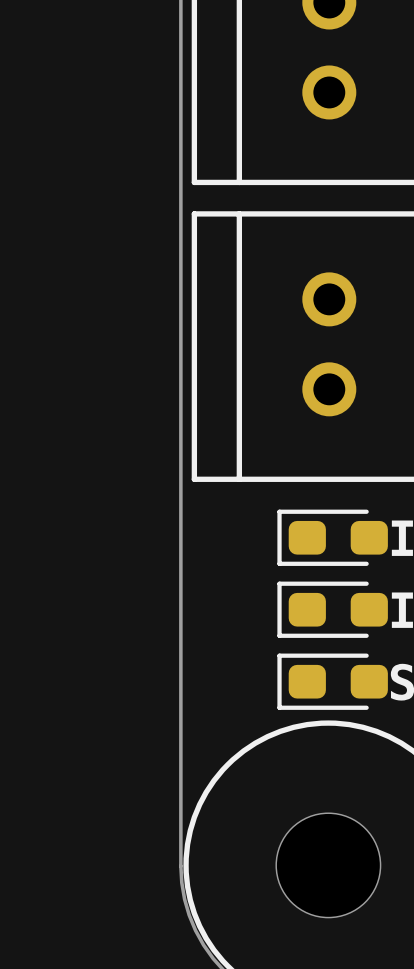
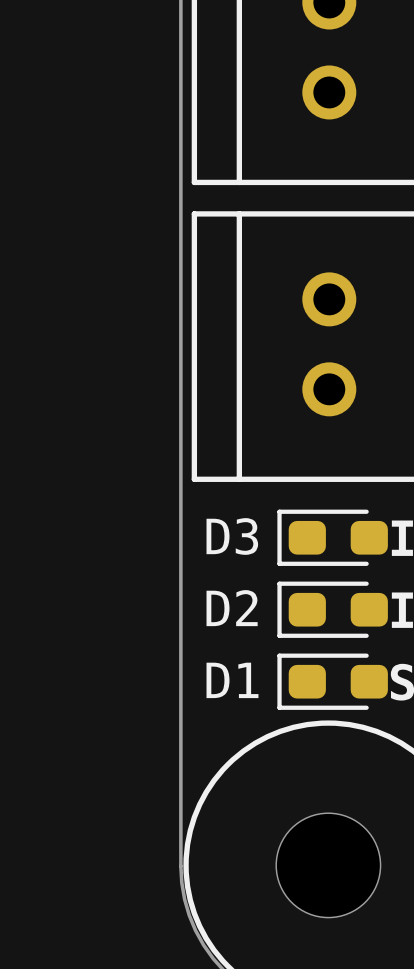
D3 name: none -> D3 (232, 536)
D2 name: none -> D2 (232, 608)
D1 name: none -> D1 (232, 680)

